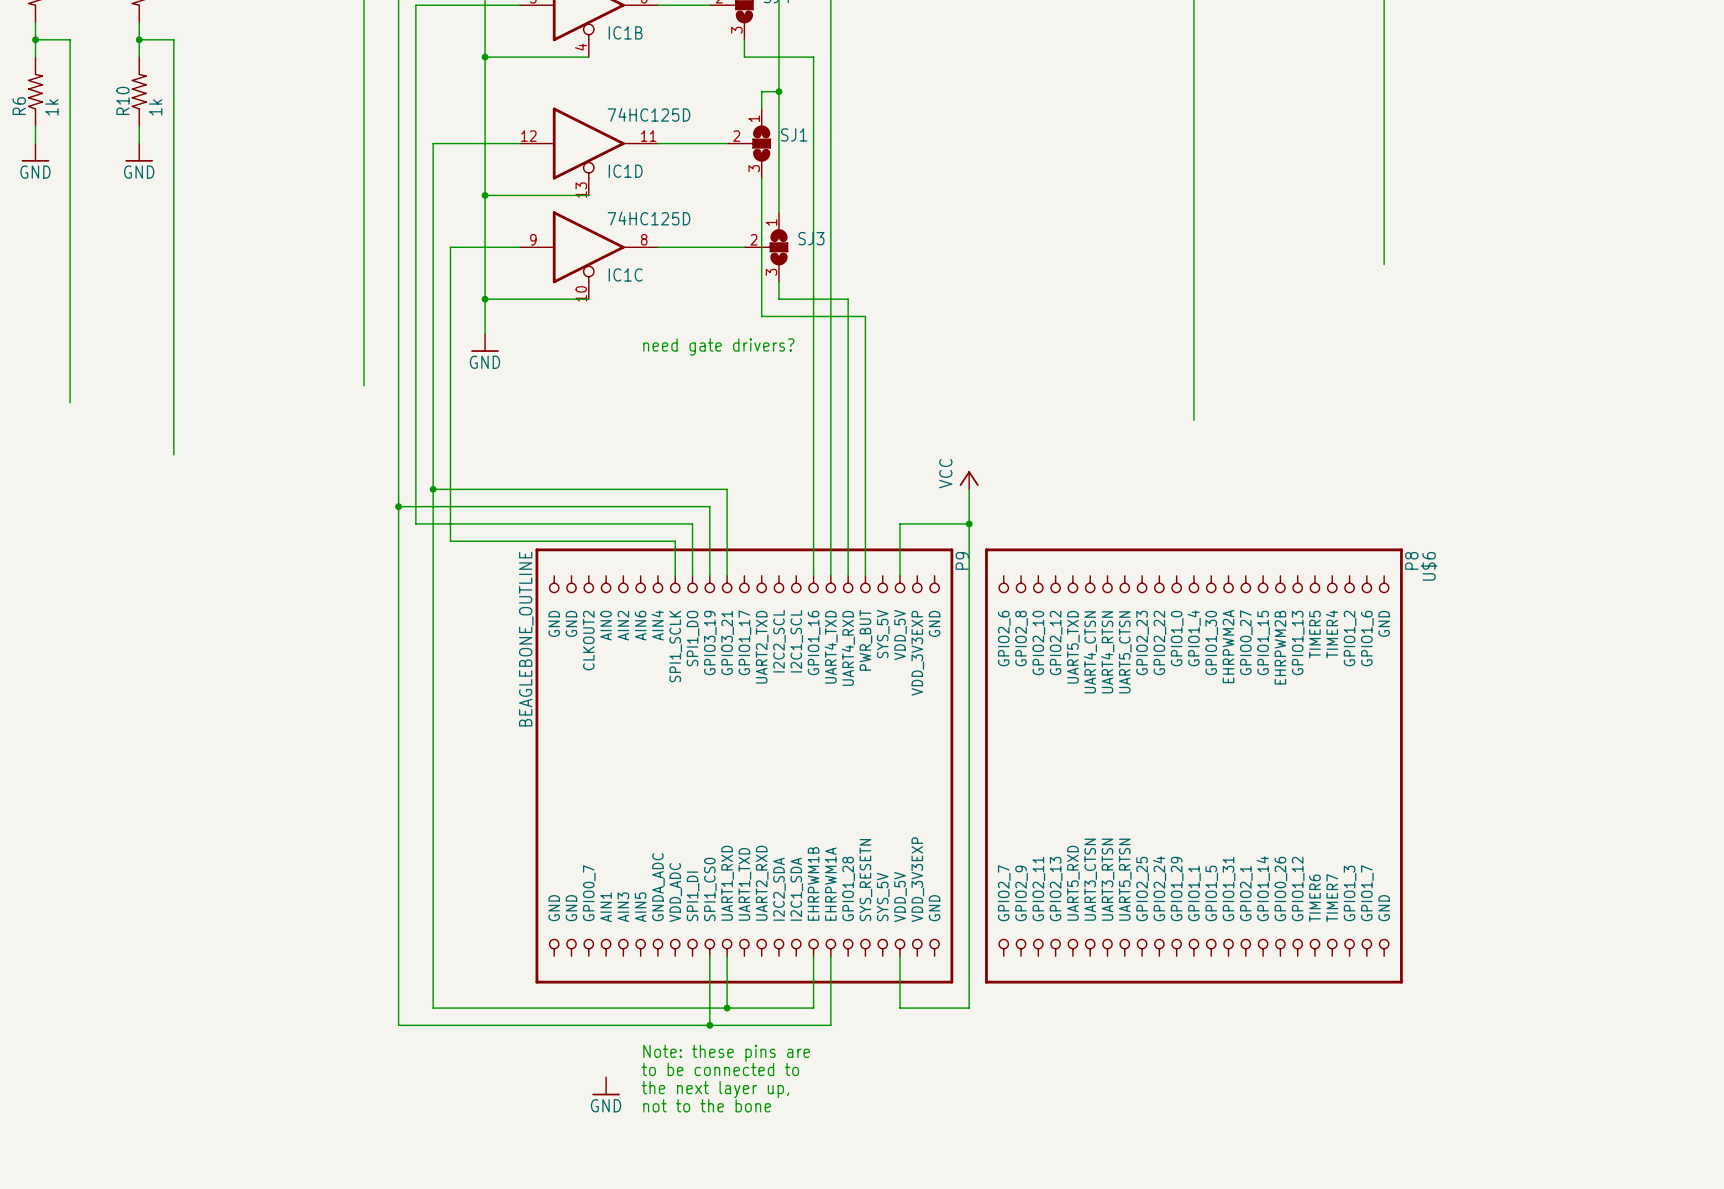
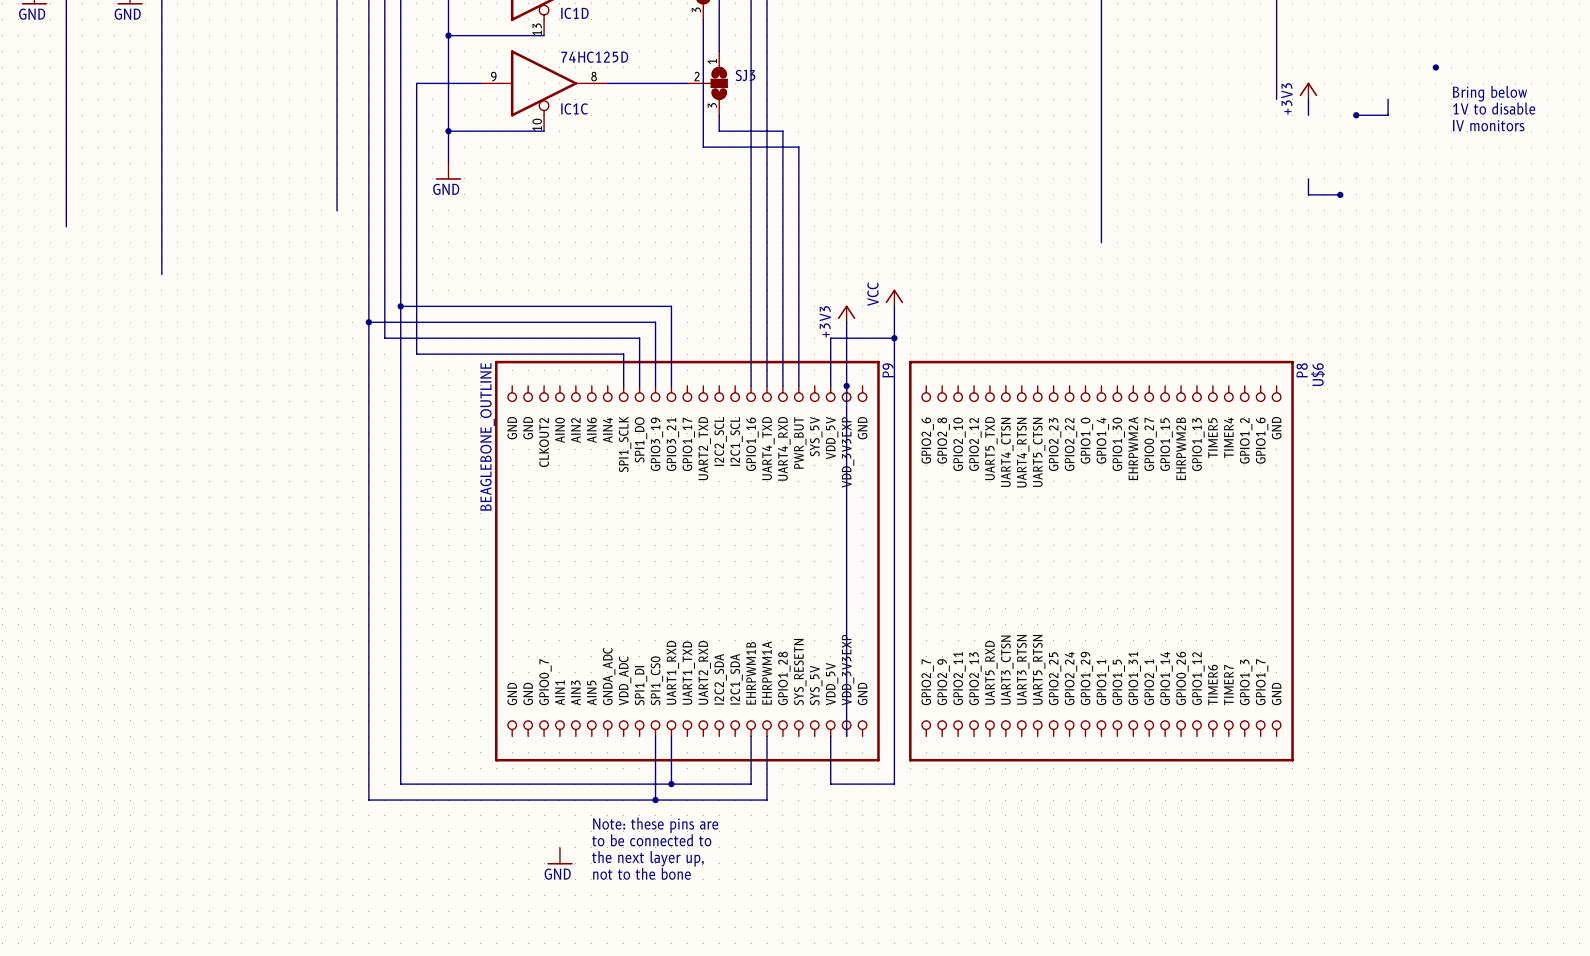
junction: none -> (1435, 67)
power symbol: none -> +3V3 (1308, 90)
text: none -> Bring below (1489, 93)
wire: none -> (1308, 99) (1308, 115)
wire: none -> (1388, 99) (1388, 115) (1356, 115)
text: none -> 1V to disable (1494, 108)
junction: none -> (1356, 115)
text: none -> IV monitors (1488, 125)
text: need gate drivers? (718, 347) -> none
wire: none -> (1308, 178) (1308, 194) (1340, 194)
junction: none -> (1340, 194)
power symbol: none -> +3V3 (846, 313)
wire: none -> (846, 322) (846, 736)
junction: none -> (846, 385)

